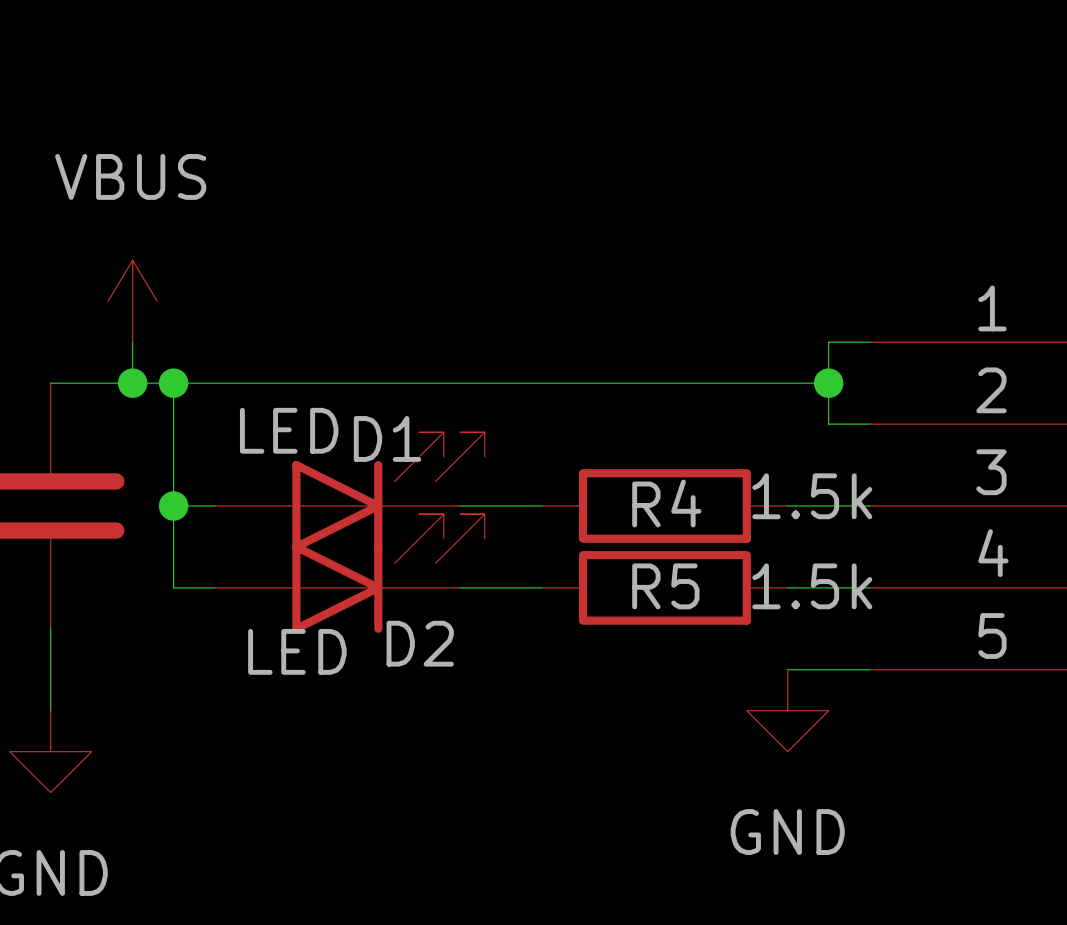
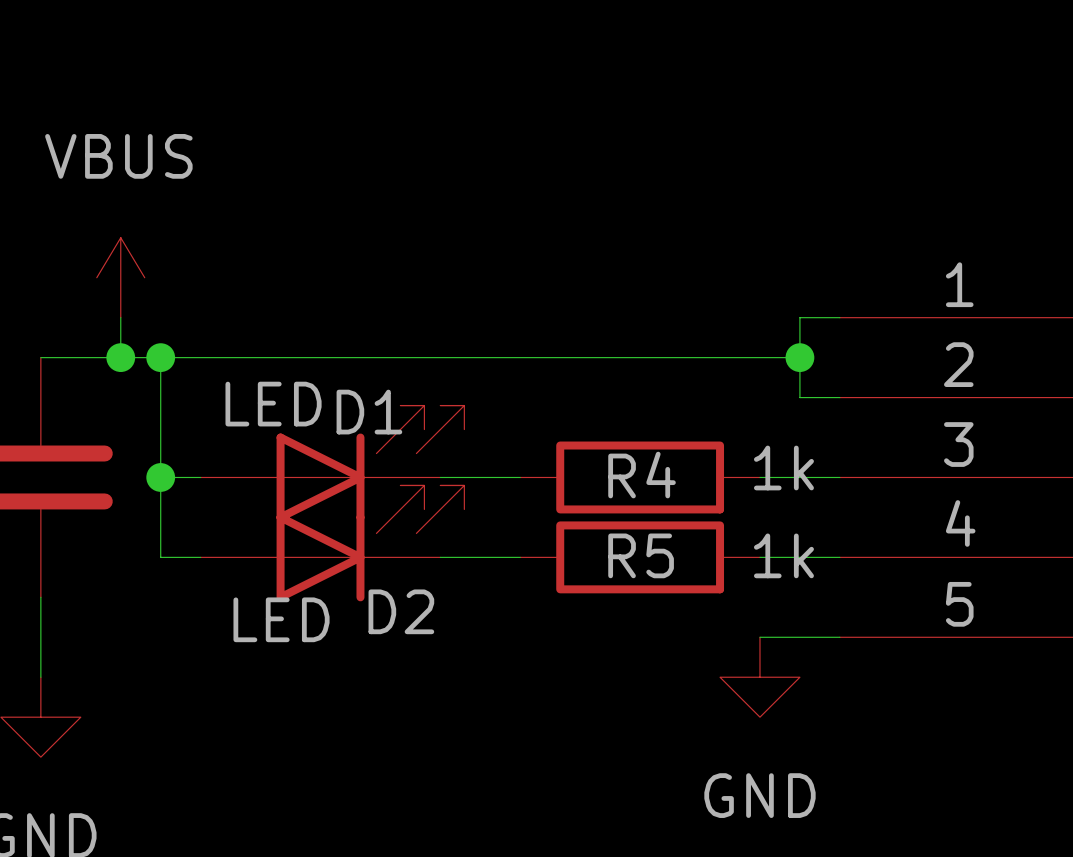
R4 value: 1.5k (812, 496) -> 1k (783, 467)
R5 value: 1.5k (812, 586) -> 1k (783, 555)

